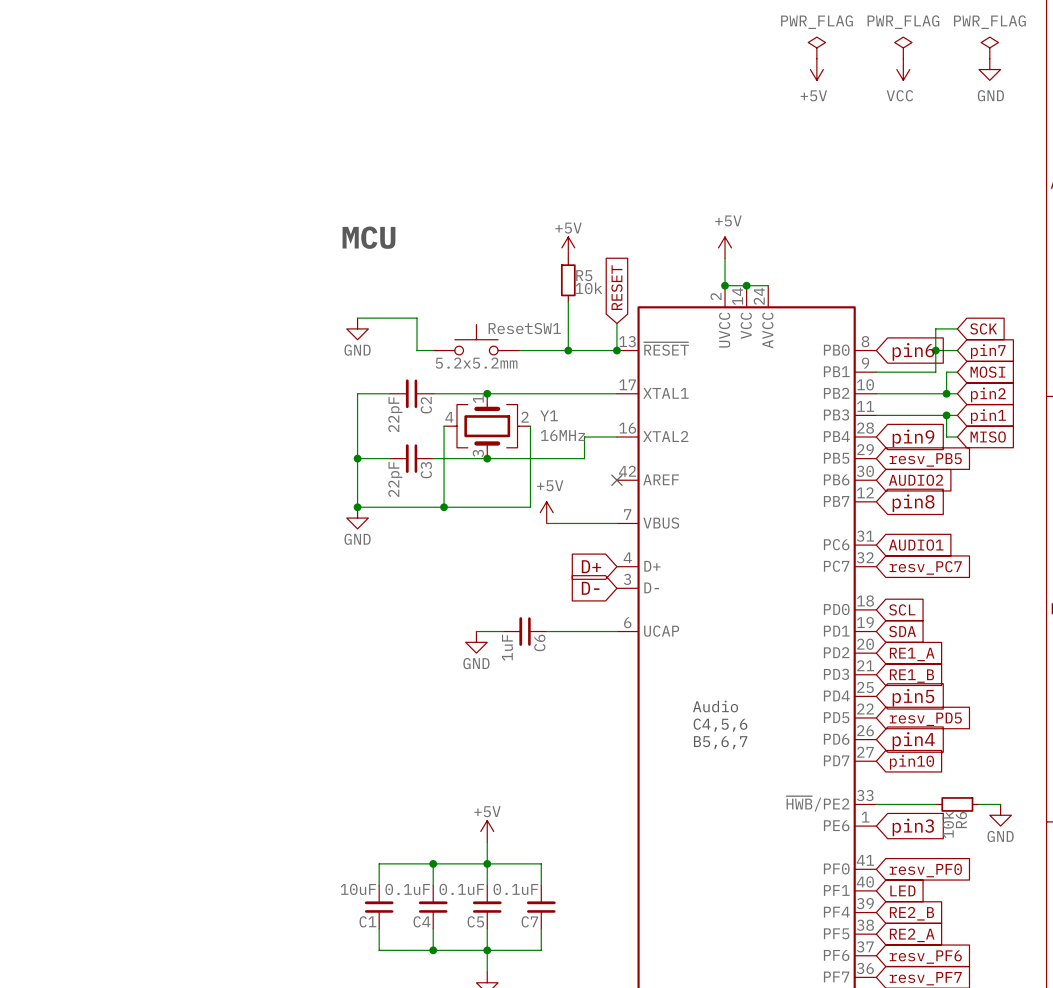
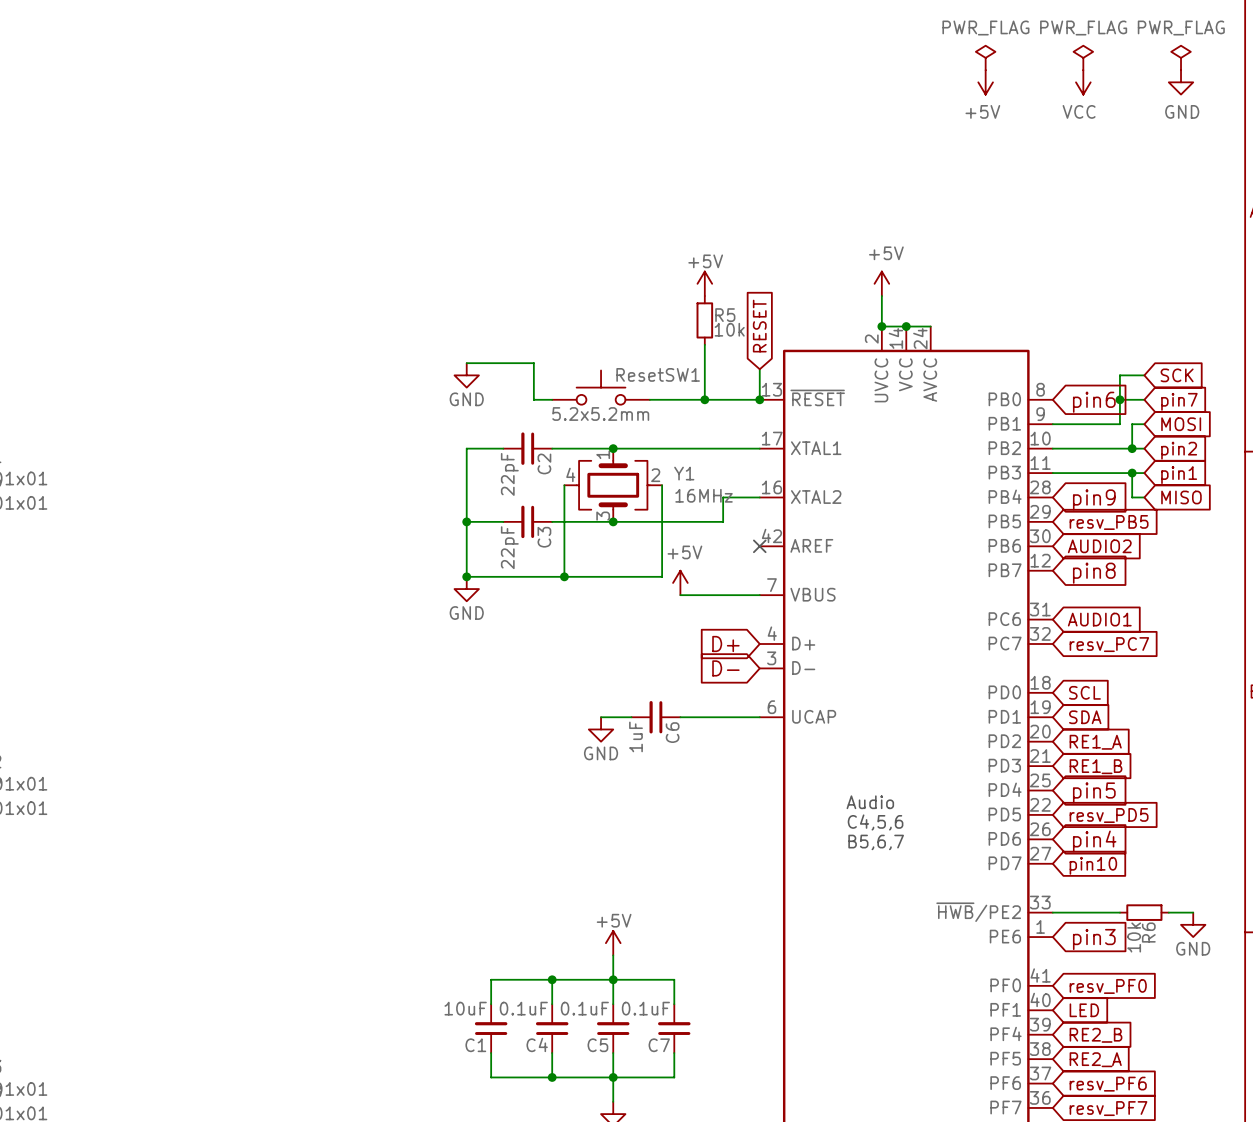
text: MCU (368, 237) -> none

